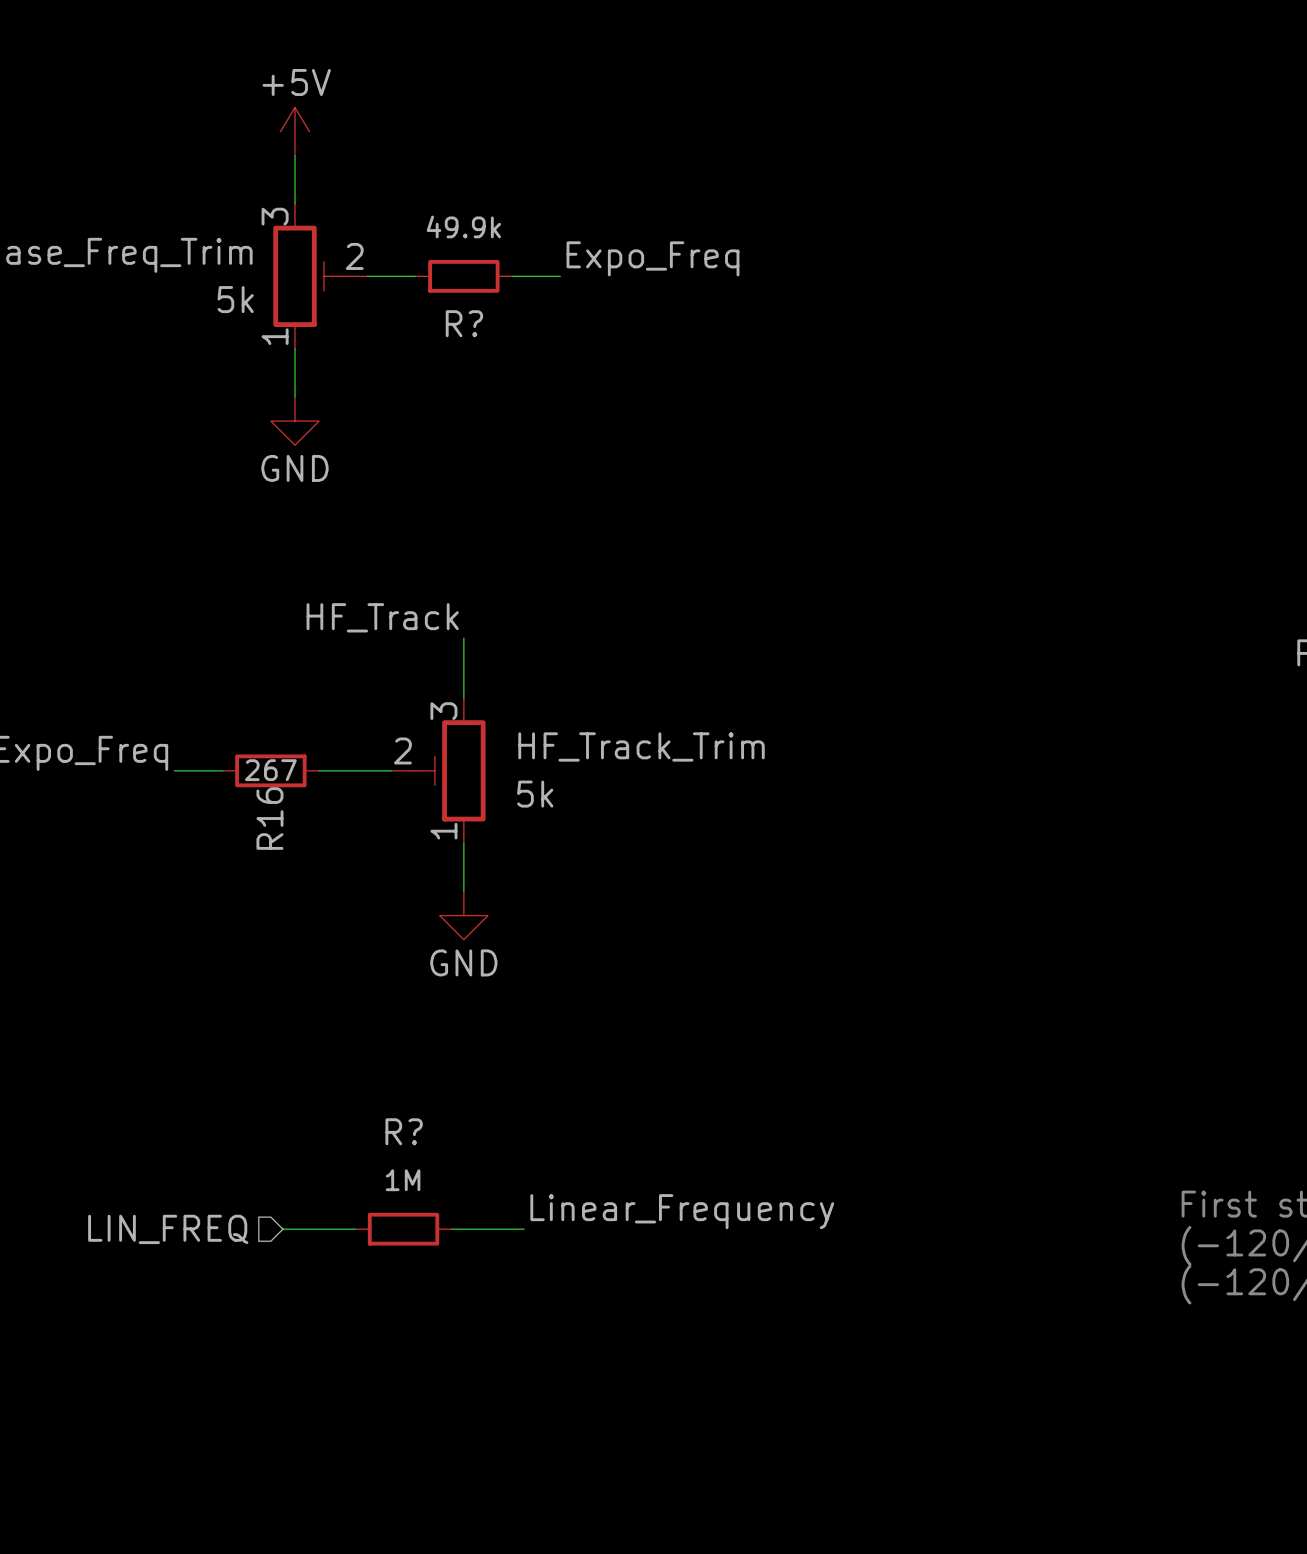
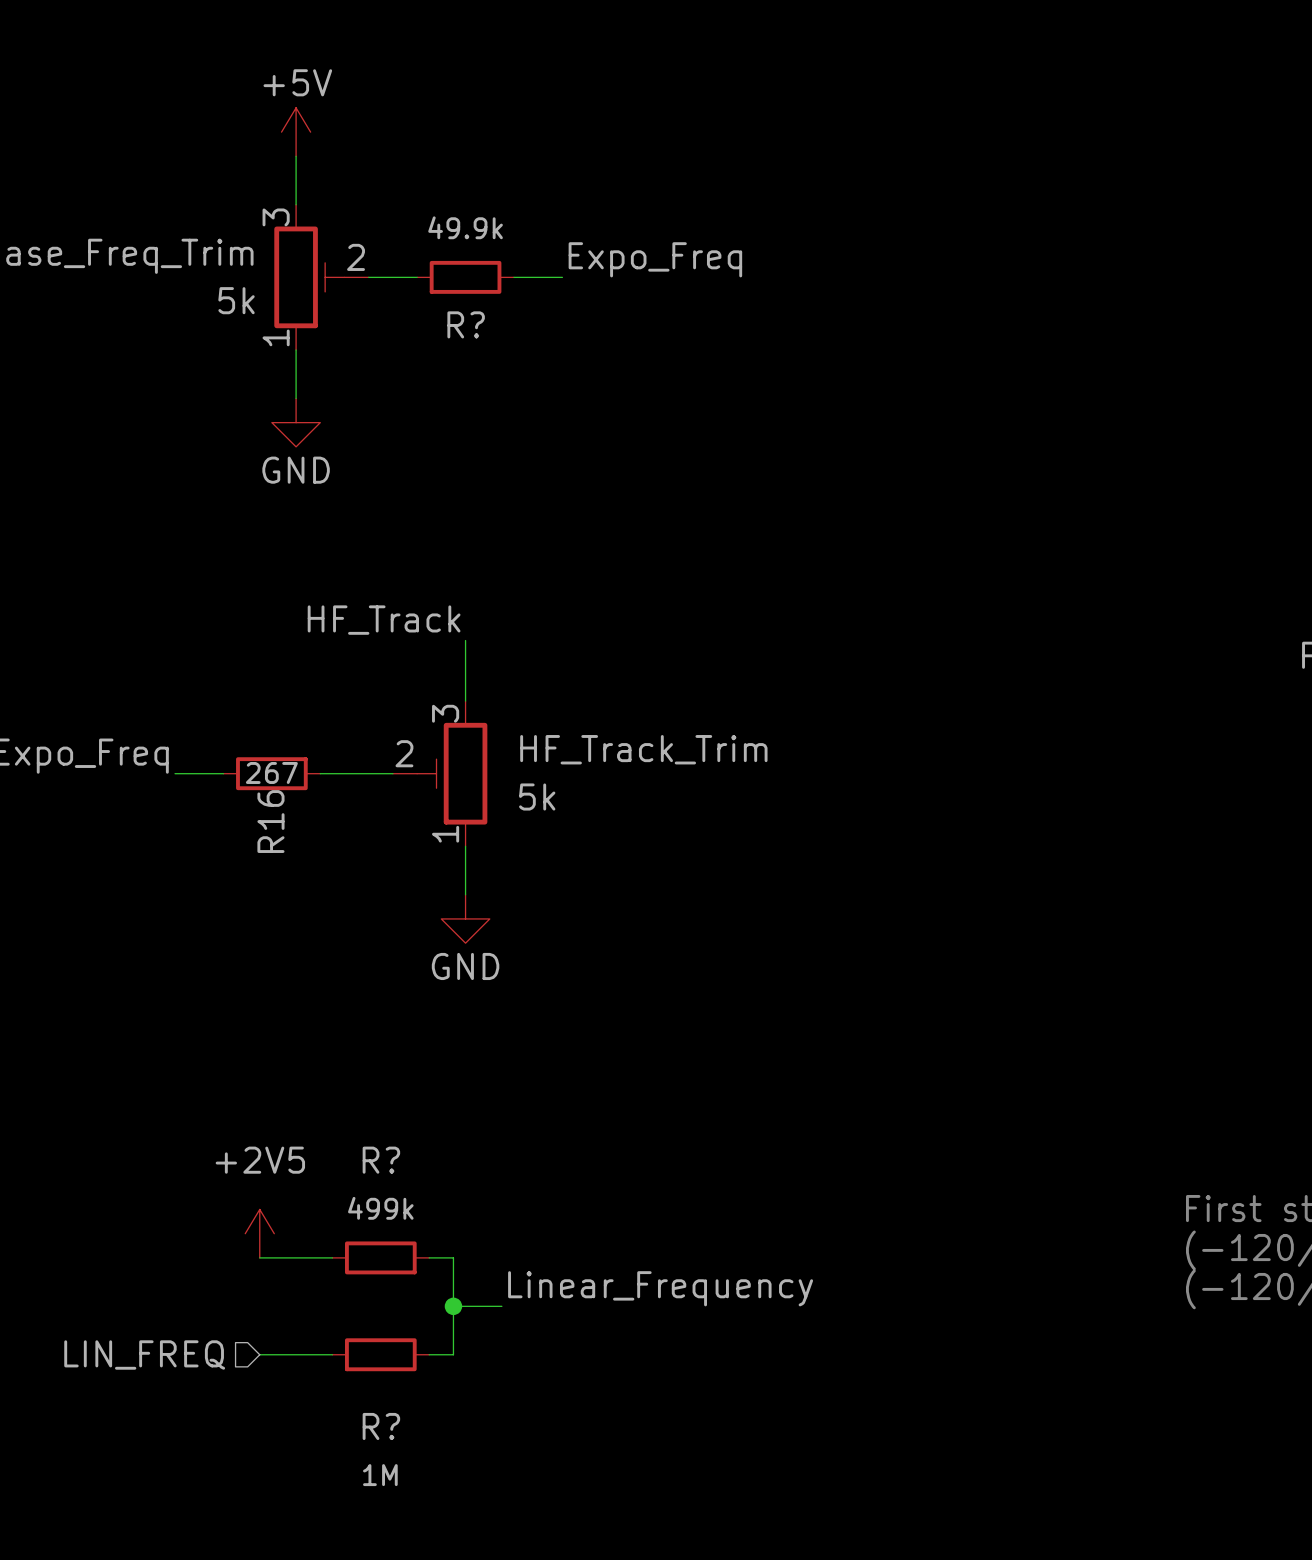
R? name position: R? (404, 1131) -> R? (381, 1426)
R? value position: 1M (403, 1180) -> 1M (380, 1475)
label position: Linear_Frequency (682, 1211) -> Linear_Frequency (660, 1288)
hierarchical label position: LIN_FREQ (168, 1229) -> LIN_FREQ (144, 1355)
power symbol: none -> +2V5 (259, 1233)
wire: (282, 1229) (355, 1229) -> (259, 1257) (332, 1257)
R? position: (403, 1229) -> (380, 1354)
wire: (451, 1229) (524, 1229) -> (259, 1354) (332, 1354)
R?: none -> 499k (380, 1257)
wire: none -> (429, 1257) (453, 1257) (453, 1354) (429, 1354)
wire: none -> (453, 1306) (501, 1306)
junction: none -> (453, 1306)

